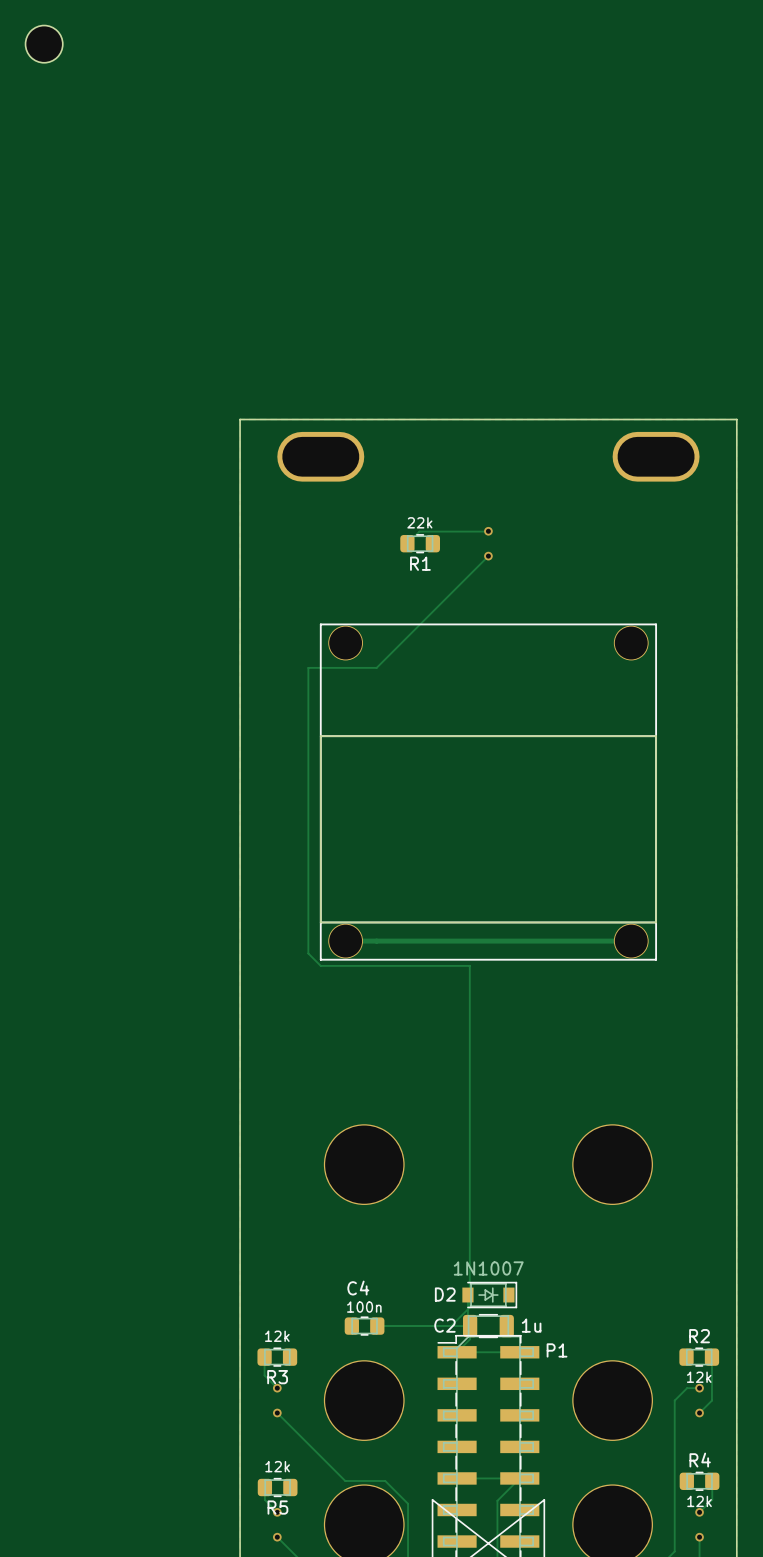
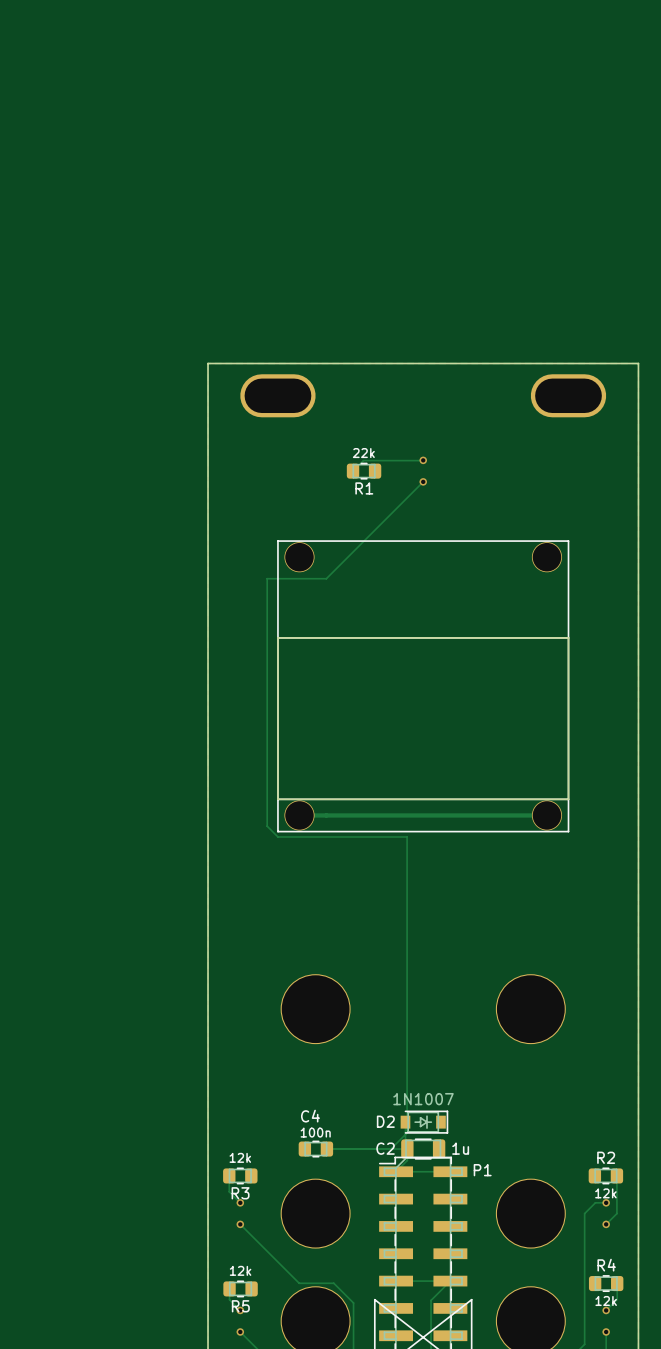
part: (44, 44) -> none

